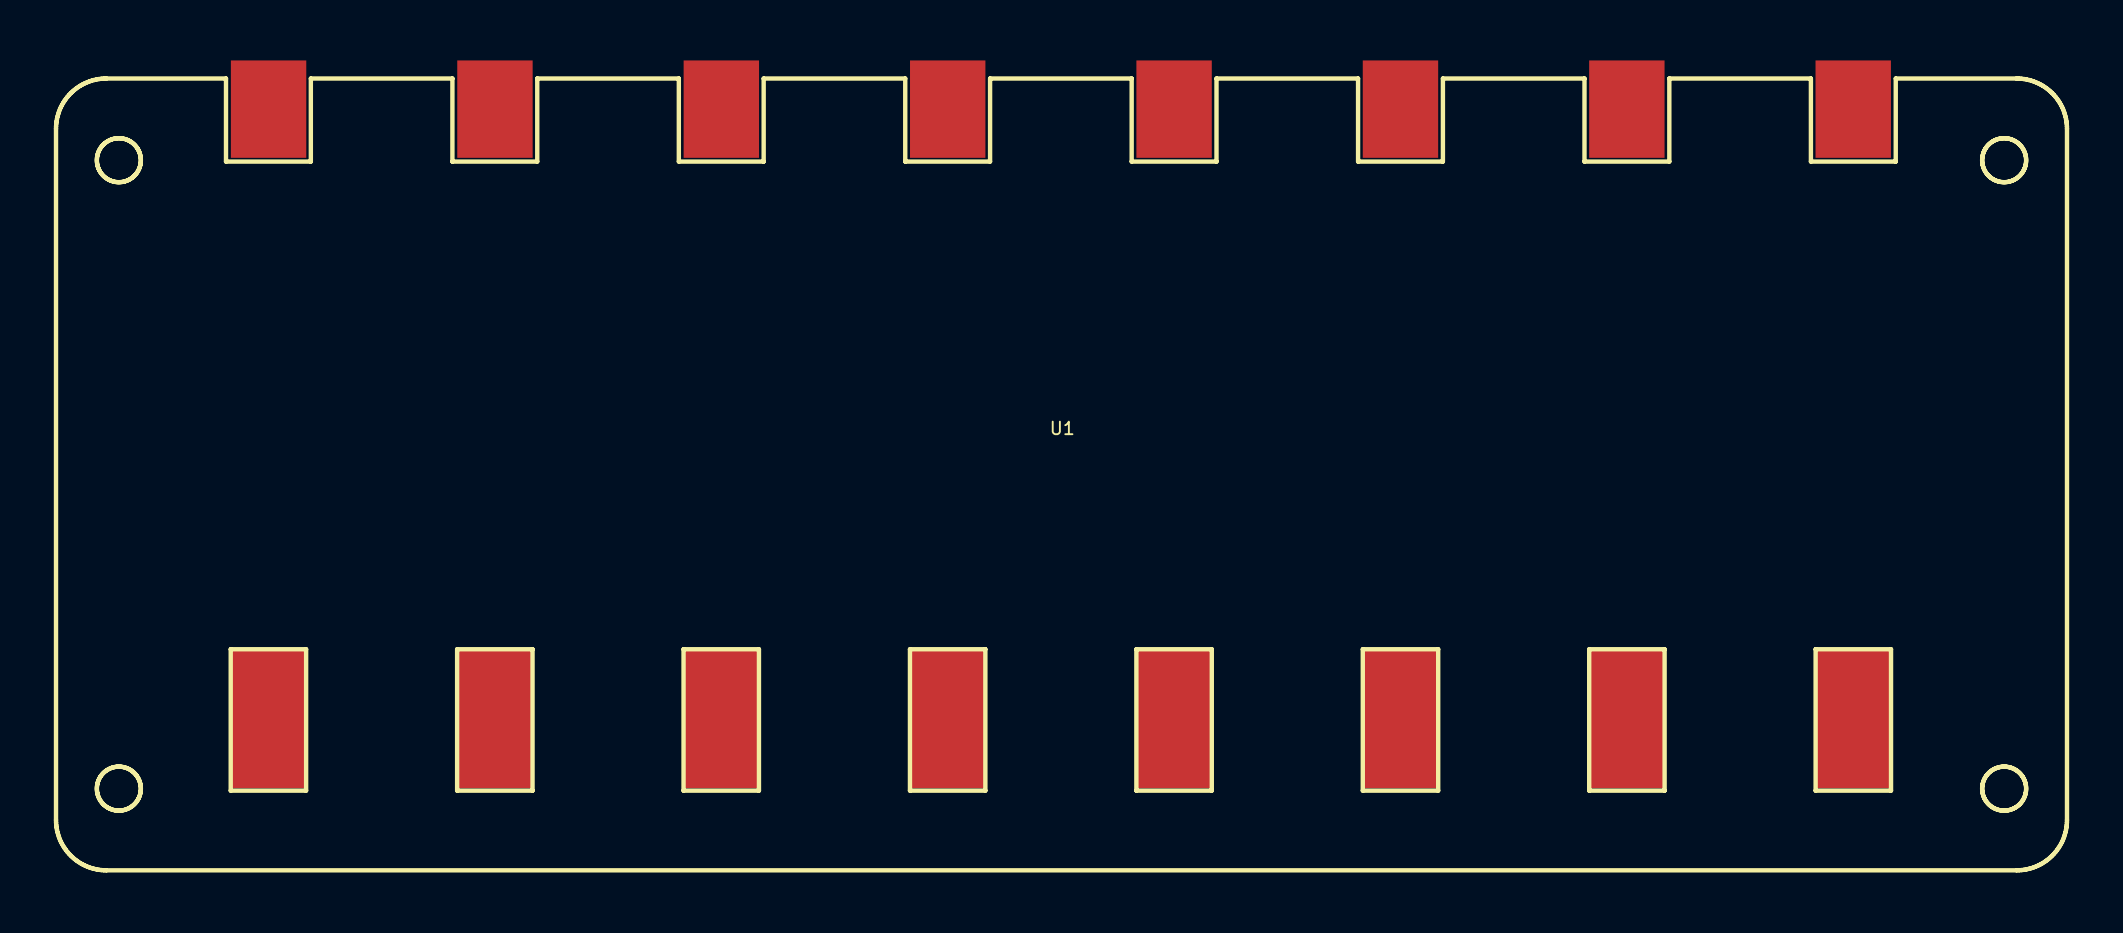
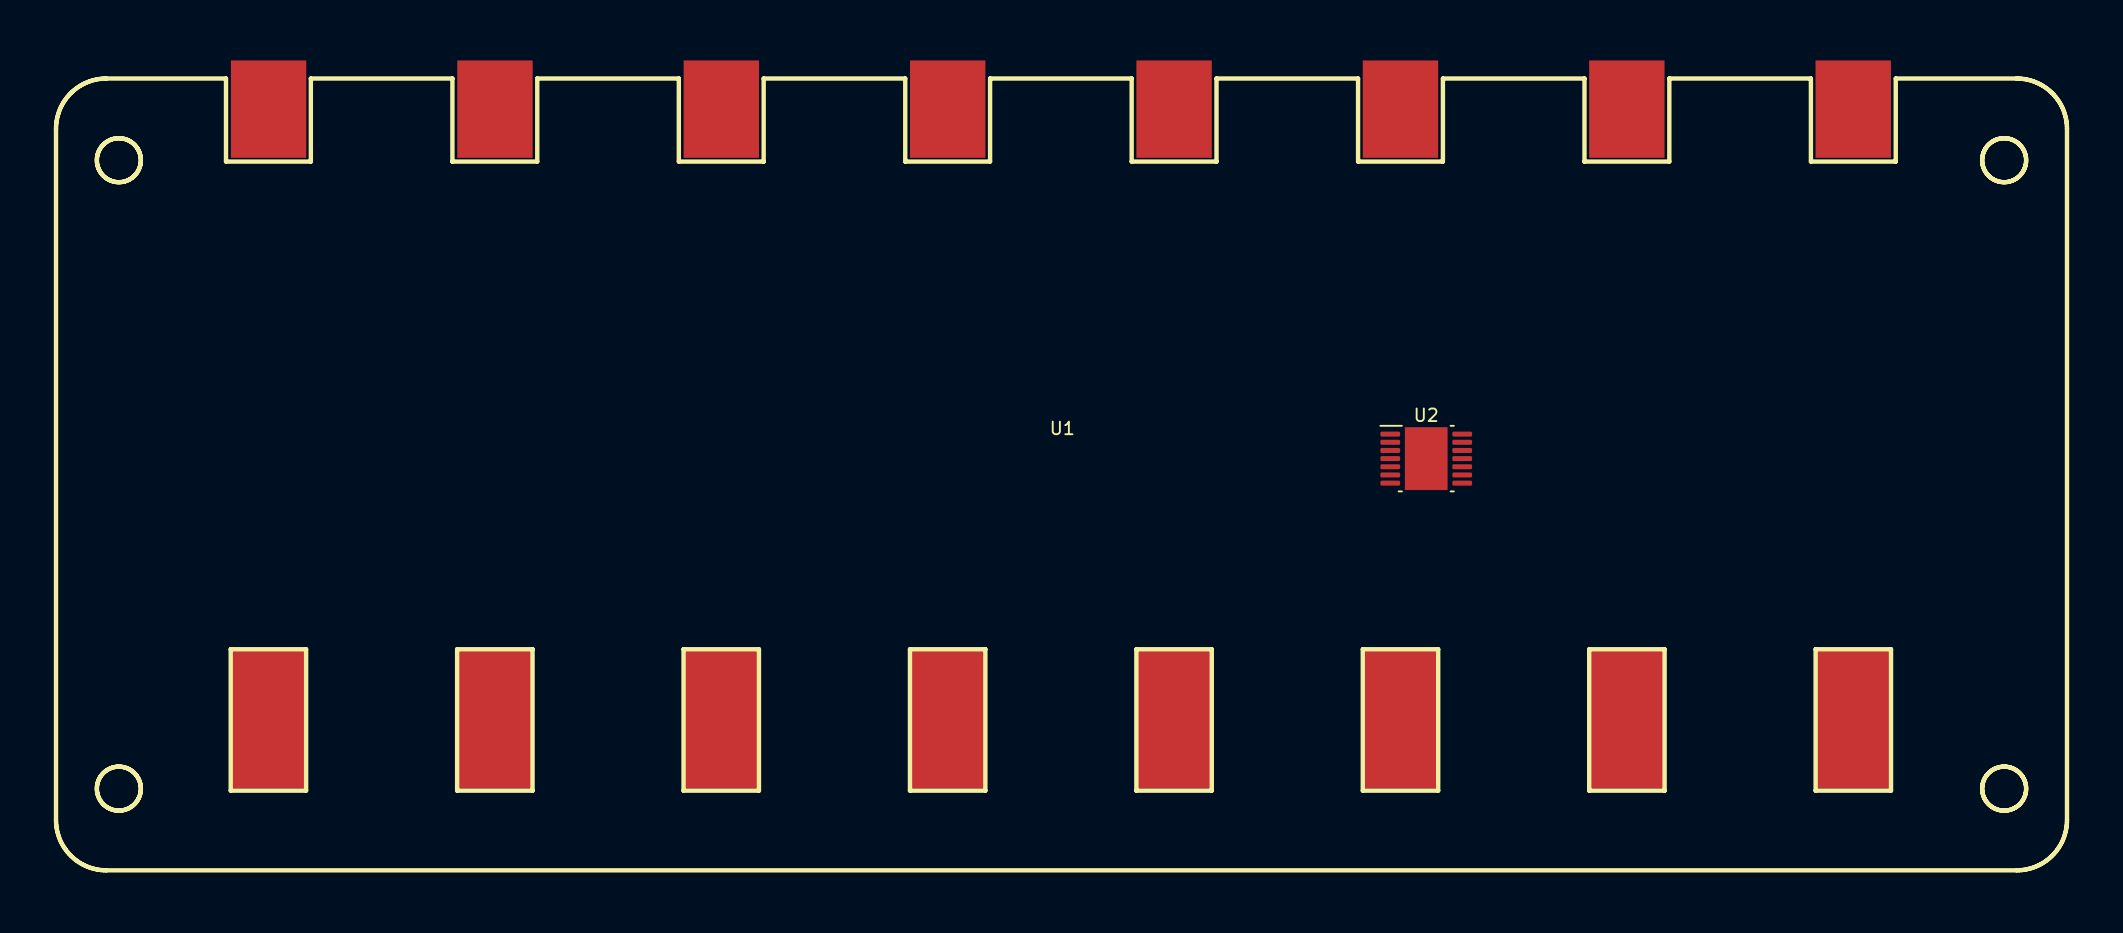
U2: none -> (1425, 458)

